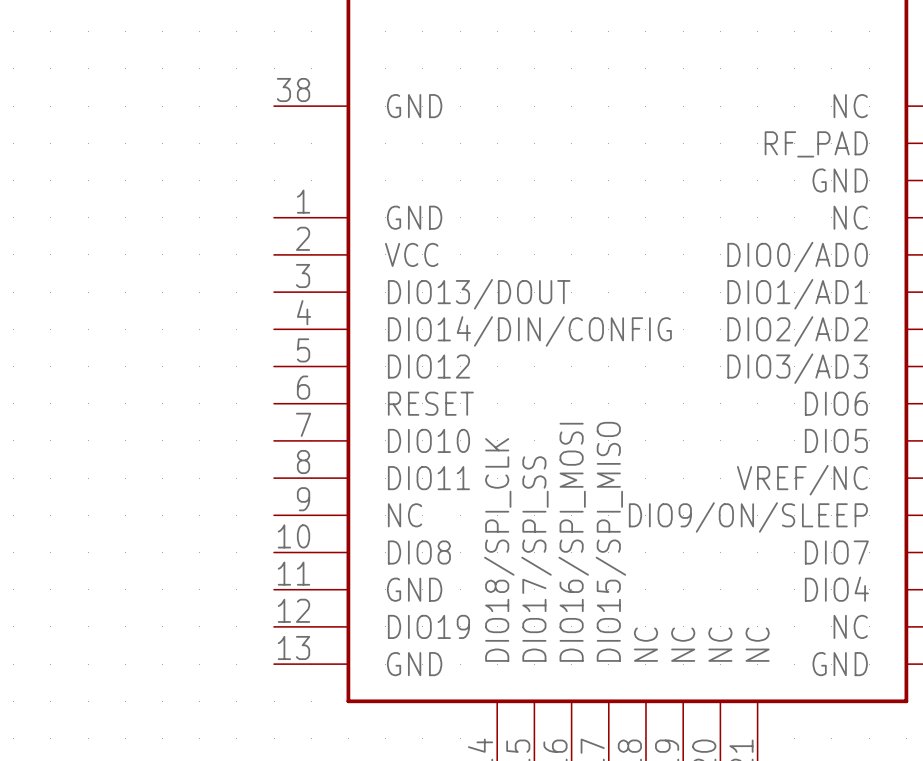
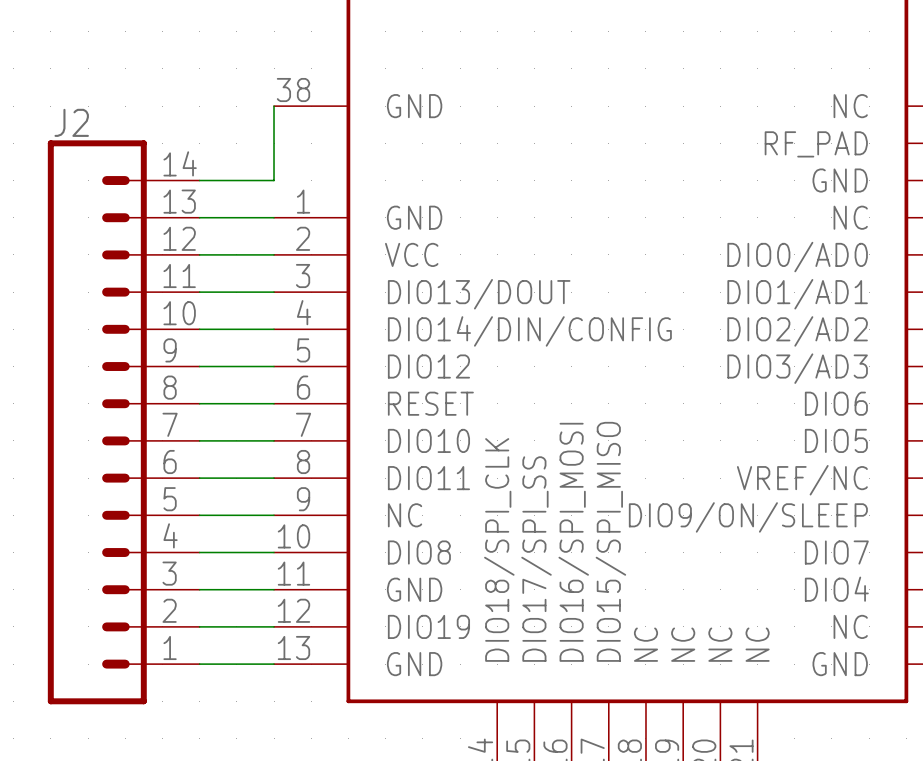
wire: none -> (274, 106) (274, 180) (199, 180)
wire: none -> (199, 217) (274, 217)
wire: none -> (199, 254) (274, 254)
wire: none -> (199, 292) (274, 292)
wire: none -> (199, 329) (274, 329)
wire: none -> (199, 366) (274, 366)
wire: none -> (199, 403) (274, 403)
J2: none -> (123, 422)
wire: none -> (199, 440) (274, 440)
wire: none -> (199, 478) (274, 478)
wire: none -> (199, 515) (274, 515)
wire: none -> (199, 552) (274, 552)
wire: none -> (199, 589) (274, 589)
wire: none -> (199, 626) (274, 626)
wire: none -> (199, 664) (274, 664)

